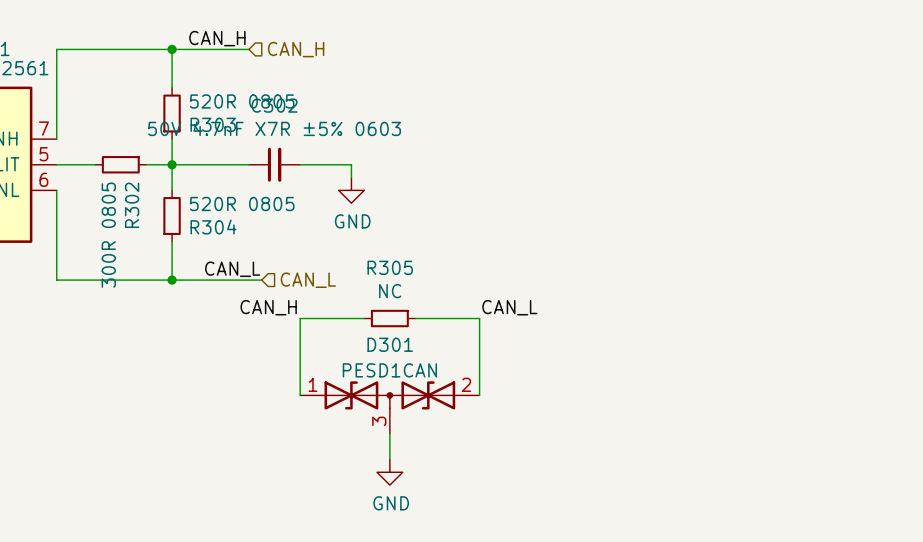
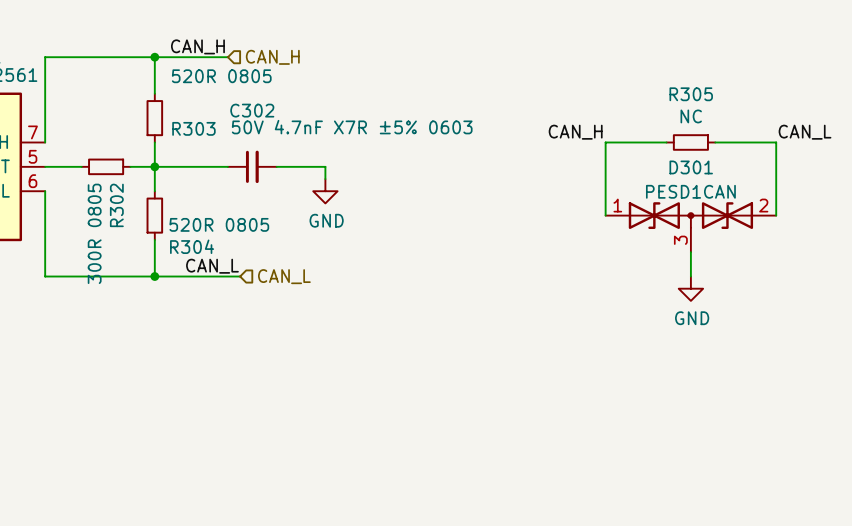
R303 value position: 520R 0805 (242, 101) -> 520R 0805 (221, 76)
C302 value position: 50V 4.7nF X7R ±5% 0603 (274, 128) -> 50V 4.7nF X7R ±5% 0603 (352, 127)
label: none -> CAN_H (575, 132)
label: none -> CAN_L (805, 132)
wire: none -> (666, 142) (605, 142) (605, 215)
wire: none -> (715, 142) (776, 142) (776, 215)
R304 value position: 520R 0805 (242, 204) -> 520R 0805 (219, 224)
R304 name position: R304 (213, 227) -> R304 (192, 246)
wire: none -> (690, 252) (690, 276)
power symbol: none -> GND (690, 288)
label: CAN_H (268, 307) -> none
label: CAN_L (509, 307) -> none
wire: (364, 318) (300, 318) (300, 395) -> none
R305 position: (389, 318) -> (690, 142)
wire: (415, 318) (479, 318) (479, 395) -> none
D301 position: (389, 407) -> (690, 227)
wire: (389, 433) (389, 459) -> none
power symbol: GND (389, 472) -> none

